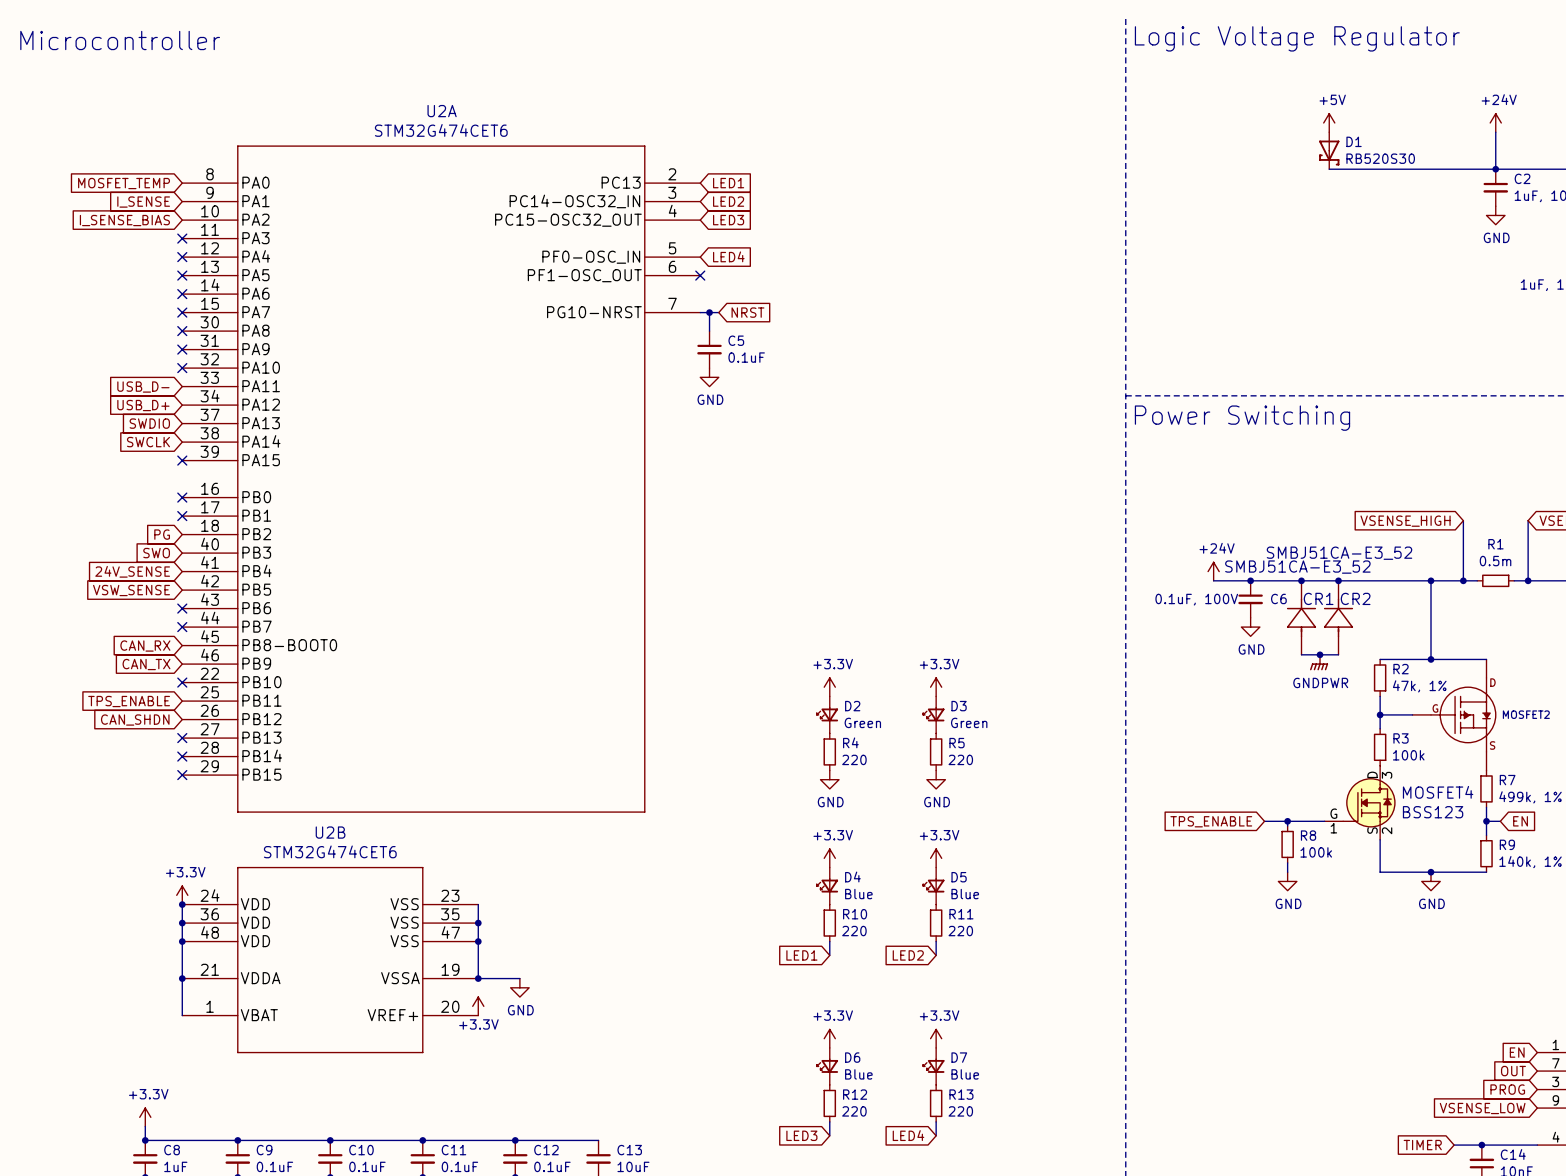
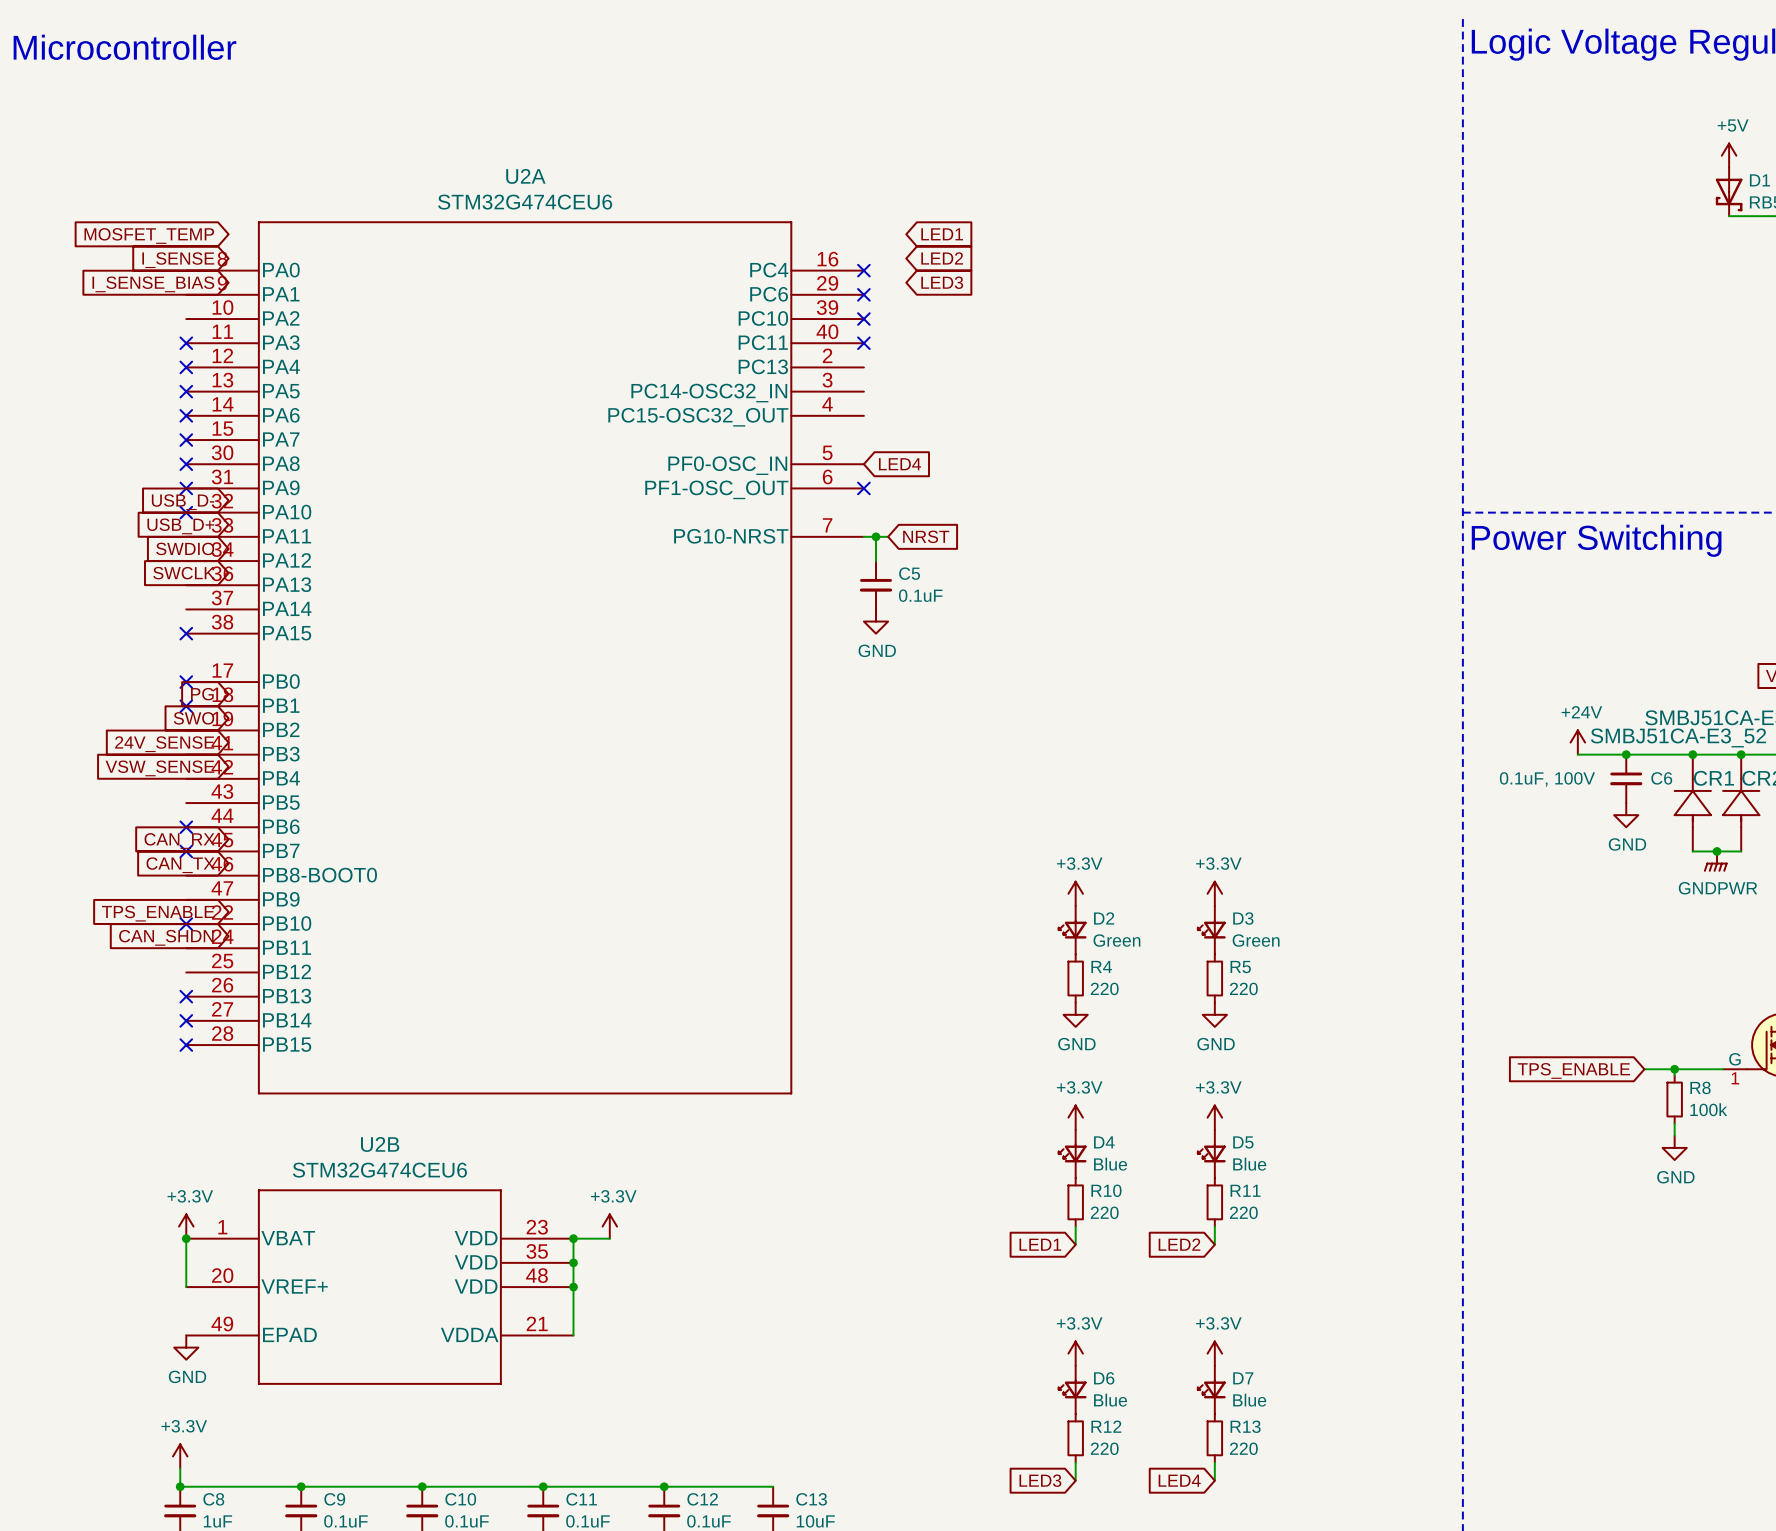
U2A value: STM32G474CET6 (441, 130) -> STM32G474CEU6 (525, 202)
U2A symbol: [182, 145, 701, 813] -> [186, 221, 864, 1095]
no-connect mark: none -> (863, 270)
no-connect mark: none -> (863, 294)
no-connect mark: (182, 238) -> none
no-connect mark: none -> (863, 319)
global label position: LED4 (728, 256) -> LED4 (899, 464)
no-connect mark: (182, 257) -> none
no-connect mark: none -> (186, 343)
no-connect mark: none -> (863, 343)
no-connect mark: (182, 275) -> none
no-connect mark: (700, 275) -> none
no-connect mark: none -> (186, 367)
no-connect mark: (182, 294) -> none
no-connect mark: none -> (186, 391)
no-connect mark: (182, 312) -> none
wire: (700, 312) (718, 312) -> (863, 536) (888, 536)
wire: (709, 312) (709, 331) -> (876, 536) (876, 561)
junction: (709, 312) -> none
global label position: NRST (747, 312) -> NRST (926, 536)
no-connect mark: none -> (186, 415)
no-connect mark: (182, 331) -> none
no-connect mark: none -> (186, 440)
no-connect mark: (182, 349) -> none
C5 position: (709, 349) -> (876, 585)
no-connect mark: none -> (186, 464)
no-connect mark: (182, 368) -> none
no-connect mark: none -> (186, 488)
no-connect mark: none -> (863, 488)
power symbol position: GND (709, 377) -> GND (876, 621)
no-connect mark: none -> (186, 512)
junction: none -> (876, 536)
no-connect mark: (182, 460) -> none
no-connect mark: none -> (186, 633)
no-connect mark: (182, 497) -> none
no-connect mark: (182, 516) -> none
no-connect mark: none -> (186, 682)
no-connect mark: none -> (186, 706)
no-connect mark: (182, 608) -> none
no-connect mark: (182, 627) -> none
no-connect mark: none -> (186, 827)
no-connect mark: none -> (186, 851)
no-connect mark: (182, 682) -> none
no-connect mark: none -> (186, 924)
no-connect mark: (182, 738) -> none
no-connect mark: (182, 756) -> none
no-connect mark: none -> (186, 996)
no-connect mark: (182, 775) -> none
no-connect mark: none -> (186, 1020)
no-connect mark: none -> (186, 1045)
U2B name position: U2B (330, 832) -> U2B (380, 1144)
U2B value: STM32G474CET6 (330, 851) -> STM32G474CEU6 (379, 1170)
U2B symbol: [182, 867, 479, 1054] -> [186, 1189, 574, 1385]
power symbol position: +3.3V (182, 895) -> +3.3V (186, 1226)
wire: (182, 904) (182, 1015) -> none
junction: (182, 904) -> none
wire: (478, 904) (478, 978) (519, 978) -> none
junction: (182, 923) -> none
junction: (478, 923) -> none
junction: (182, 941) -> none
junction: (478, 941) -> none
wire: none -> (186, 1238) (186, 1287)
junction: none -> (186, 1238)
junction: none -> (573, 1238)
wire: none -> (609, 1238) (573, 1238) (573, 1335)
junction: none -> (573, 1262)
junction: (182, 978) -> none
junction: (478, 978) -> none
junction: none -> (573, 1287)
power symbol: GND (519, 987) -> none
power symbol position: +3.3V (478, 1006) -> +3.3V (609, 1226)
power symbol text position: +3.3V (478, 1024) -> +3.3V (613, 1196)
power symbol: none -> GND (186, 1347)

